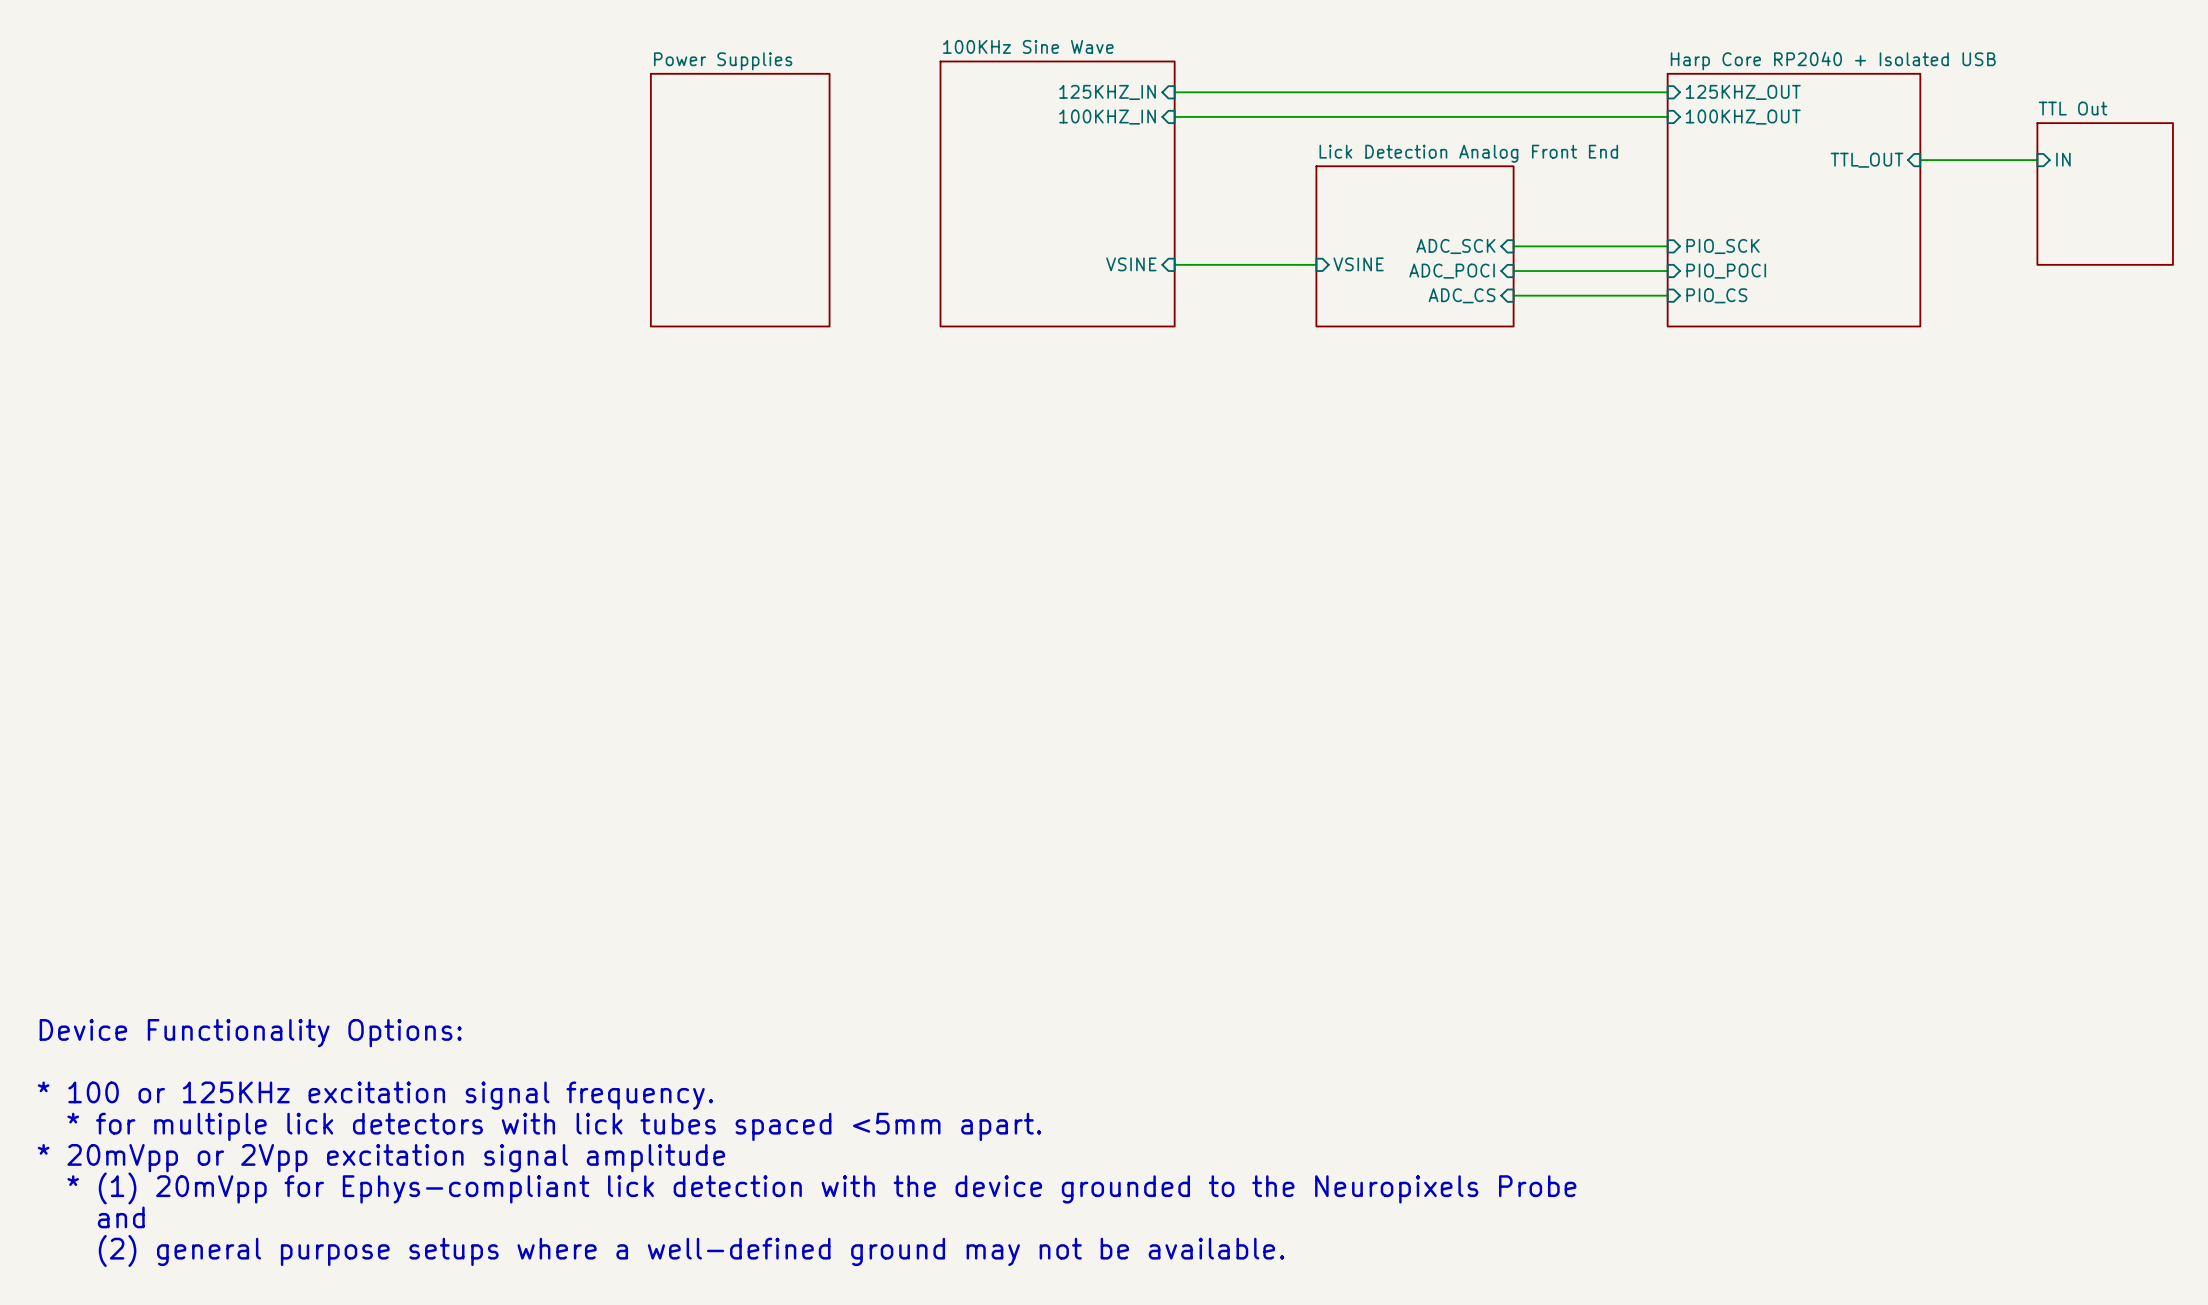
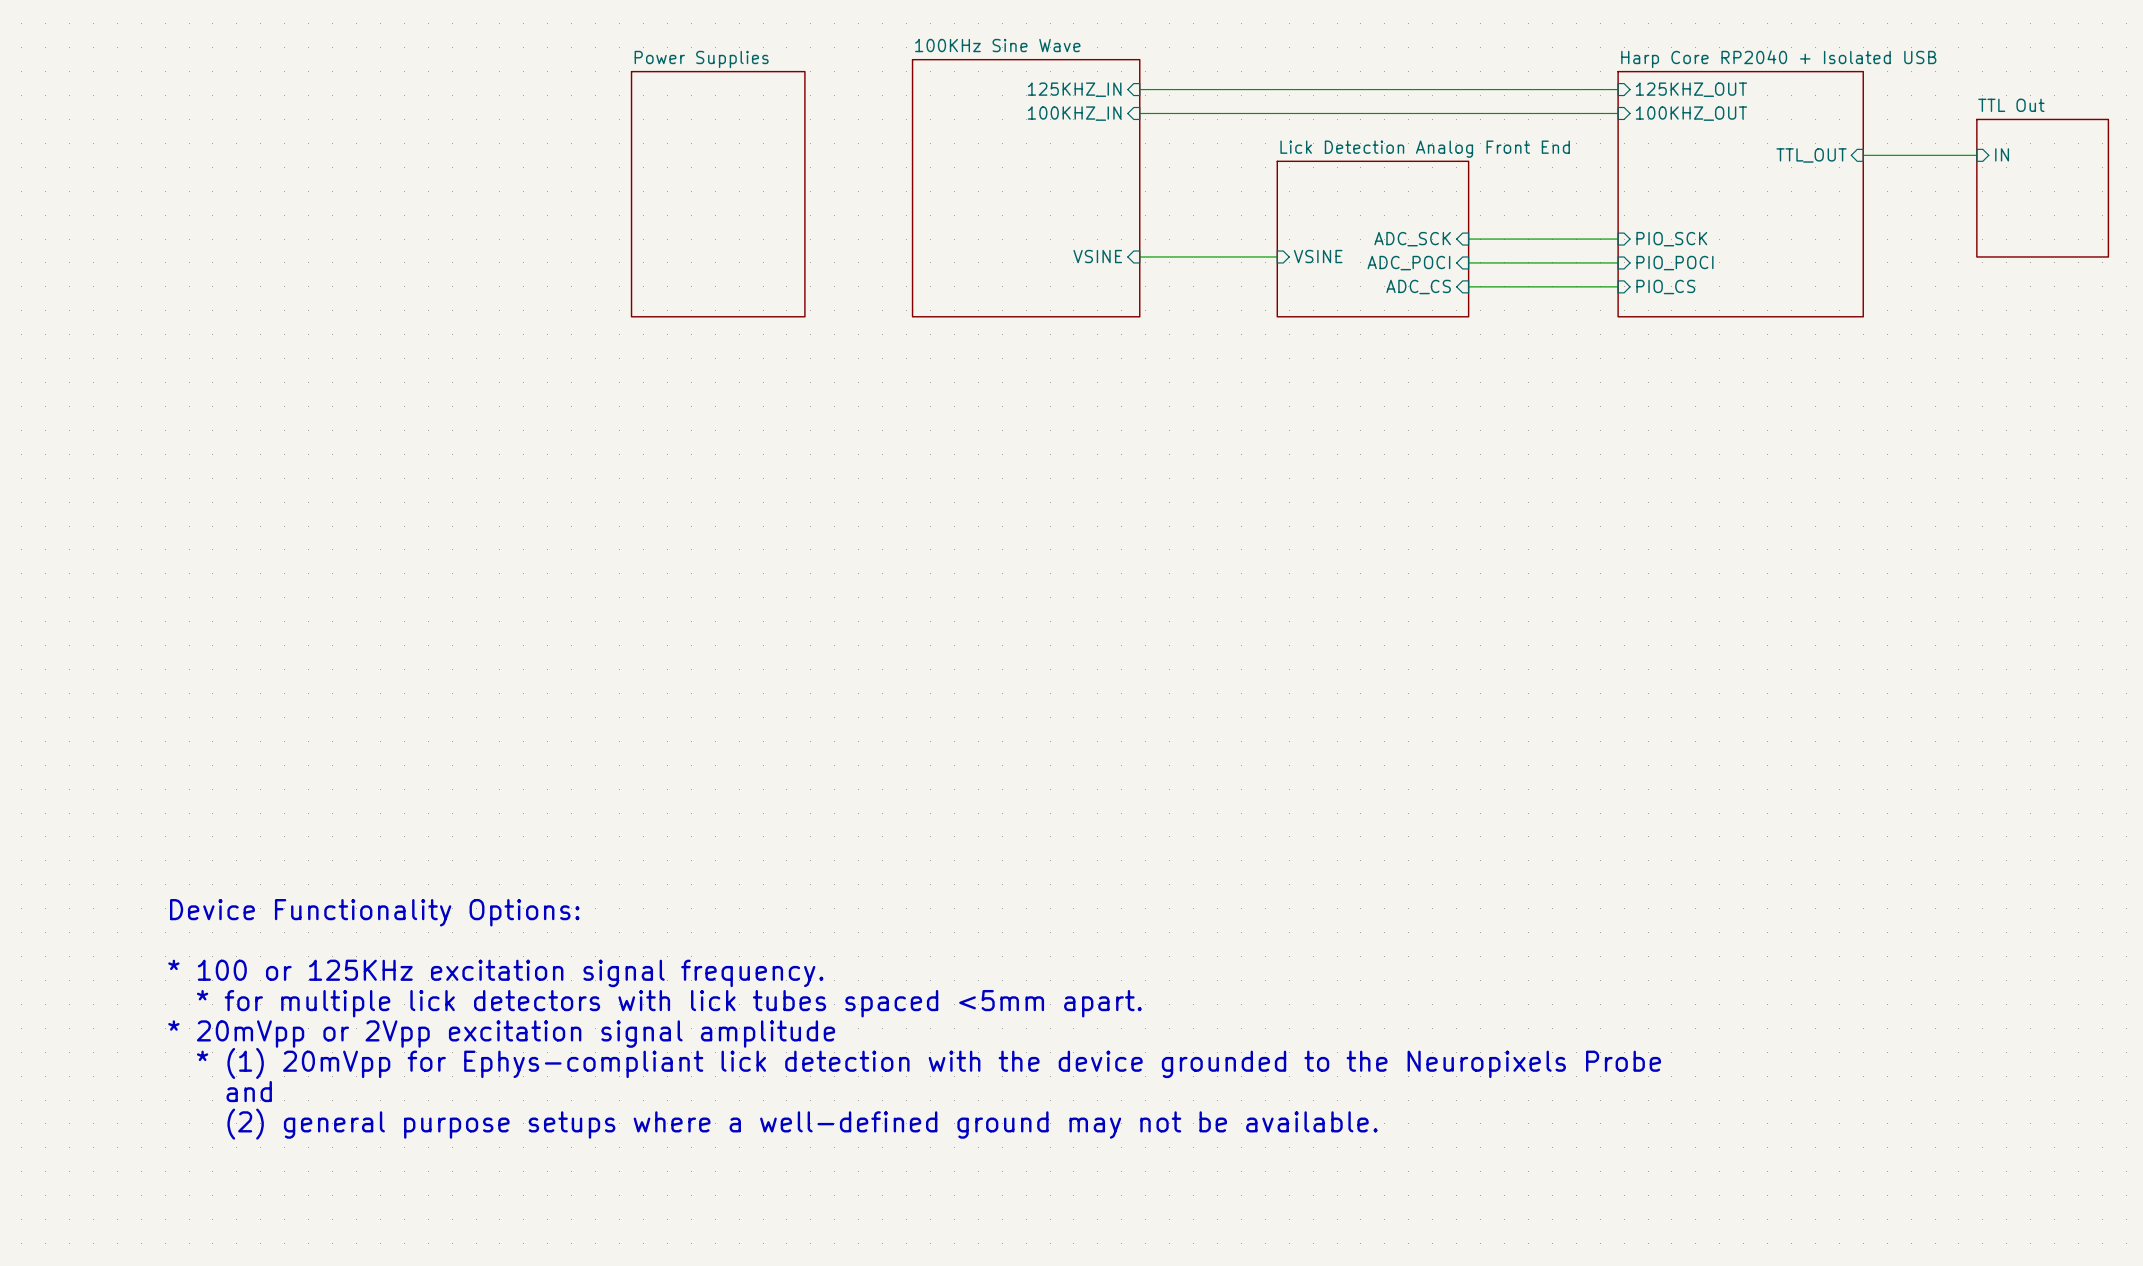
text position: Device Functionality Options: (250, 1033) -> Device Functionality Options: (374, 912)
text position: * 100 or 125KHz excitation signal frequency. (375, 1095) -> * 100 or 125KHz excitation signal frequency. (495, 973)
text position: * for multiple lick detectors with lick tubes spaced <5mm apart. (554, 1126) -> * for multiple lick detectors with lick tubes spaced <5mm apart. (669, 1003)
text position: * 20mVpp or 2Vpp excitation signal amplitude (381, 1158) -> * 20mVpp or 2Vpp excitation signal amplitude (501, 1034)
text position: * (1) 20mVpp for Ephys-compliant lick detection with the device grounded to the Neuropixels Probe (821, 1188) -> * (1) 20mVpp for Ephys-compliant lick detection with the device grounded to the Neuropixels Probe (928, 1063)
text position: and (121, 1217) -> and (249, 1091)
text position: (2) general purpose setups where a well-defined ground may not be available. (691, 1250) -> (2) general purpose setups where a well-defined ground may not be available. (802, 1124)

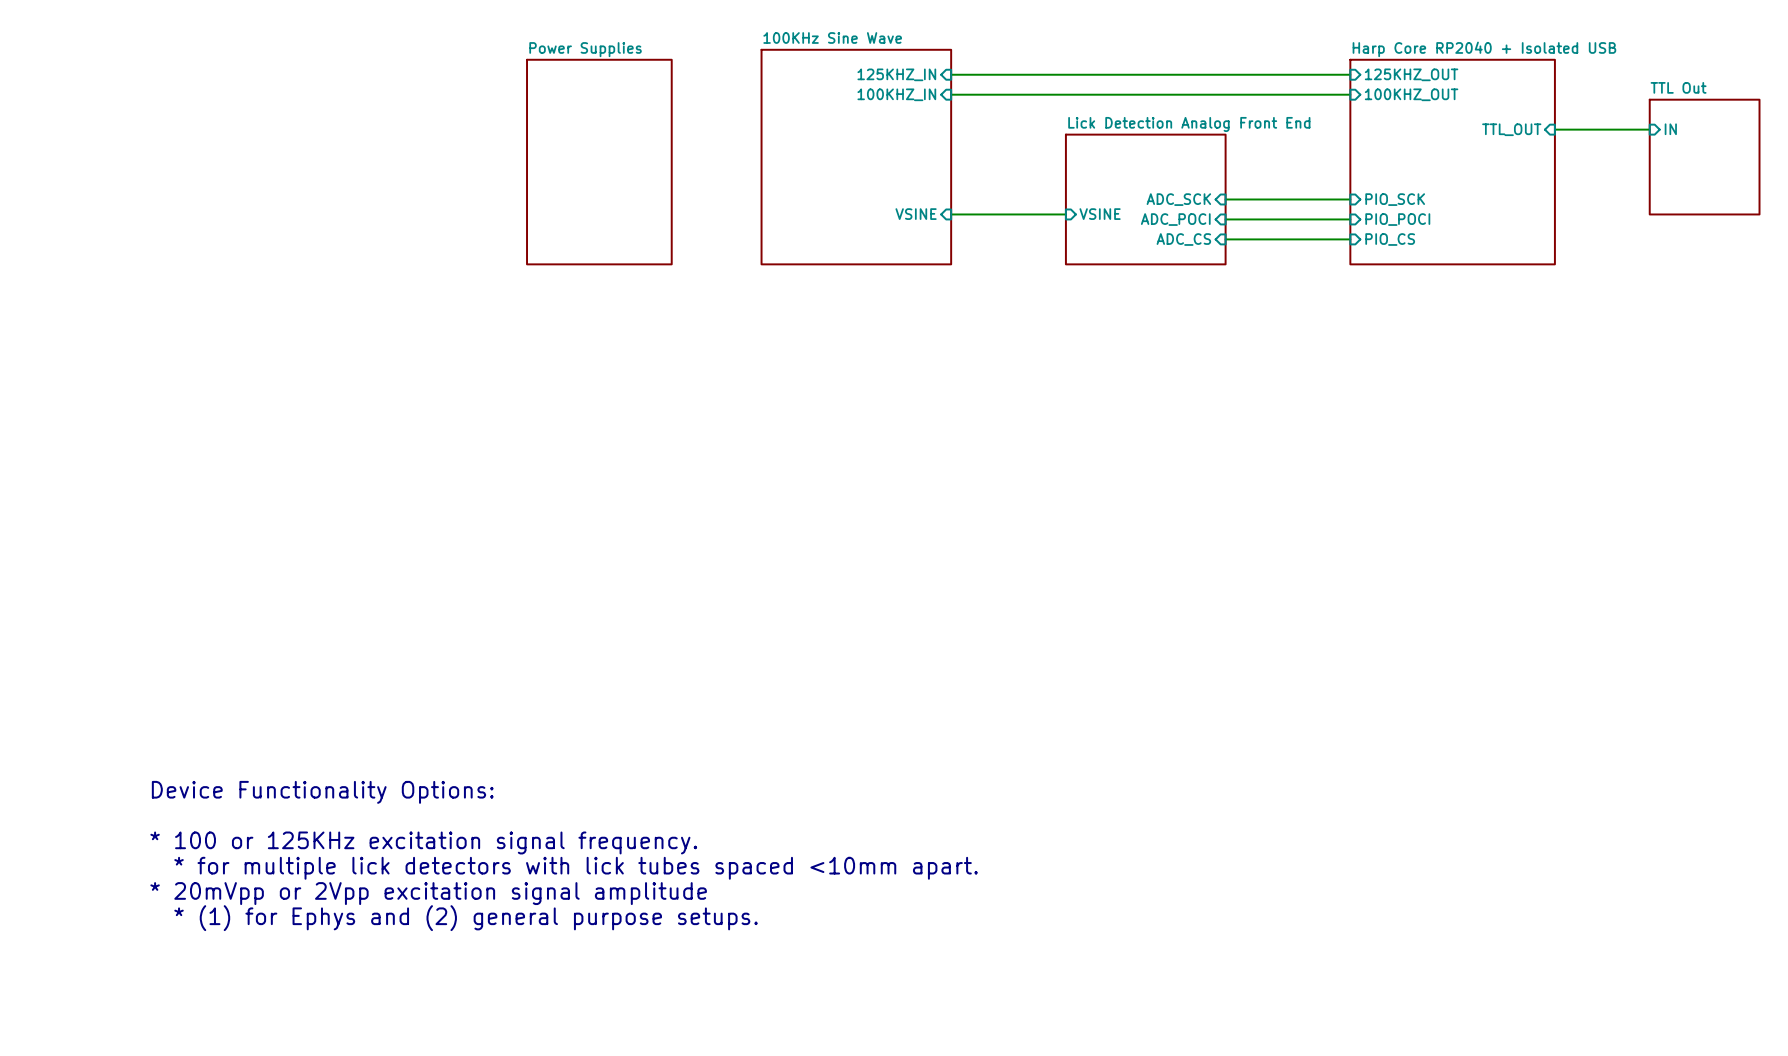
text position: Device Functionality Options: (374, 912) -> Device Functionality Options: (322, 792)
text position: * 100 or 125KHz excitation signal frequency. (495, 973) -> * 100 or 125KHz excitation signal frequency. (423, 842)
text: * for multiple lick detectors with lick tubes spaced <5mm apart. (669, 1003) -> * for multiple lick detectors with lick tubes spaced <10mm apart. (576, 868)
text position: * 20mVpp or 2Vpp excitation signal amplitude (501, 1034) -> * 20mVpp or 2Vpp excitation signal amplitude (428, 893)
text: * (1) 20mVpp for Ephys-compliant lick detection with the device grounded to the Neuropixels Probe (928, 1063) -> none
text: and (249, 1091) -> none
text: none -> * (1) for Ephys and (2) general purpose setups. (466, 918)
text: (2) general purpose setups where a well-defined ground may not be available. (802, 1124) -> none

